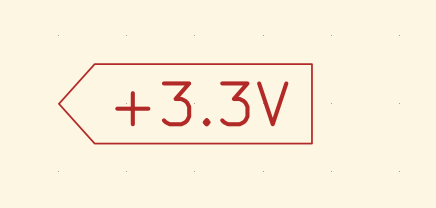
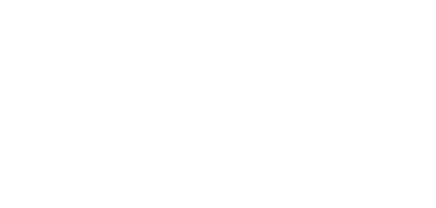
global label: +3.3V (201, 103) -> none

